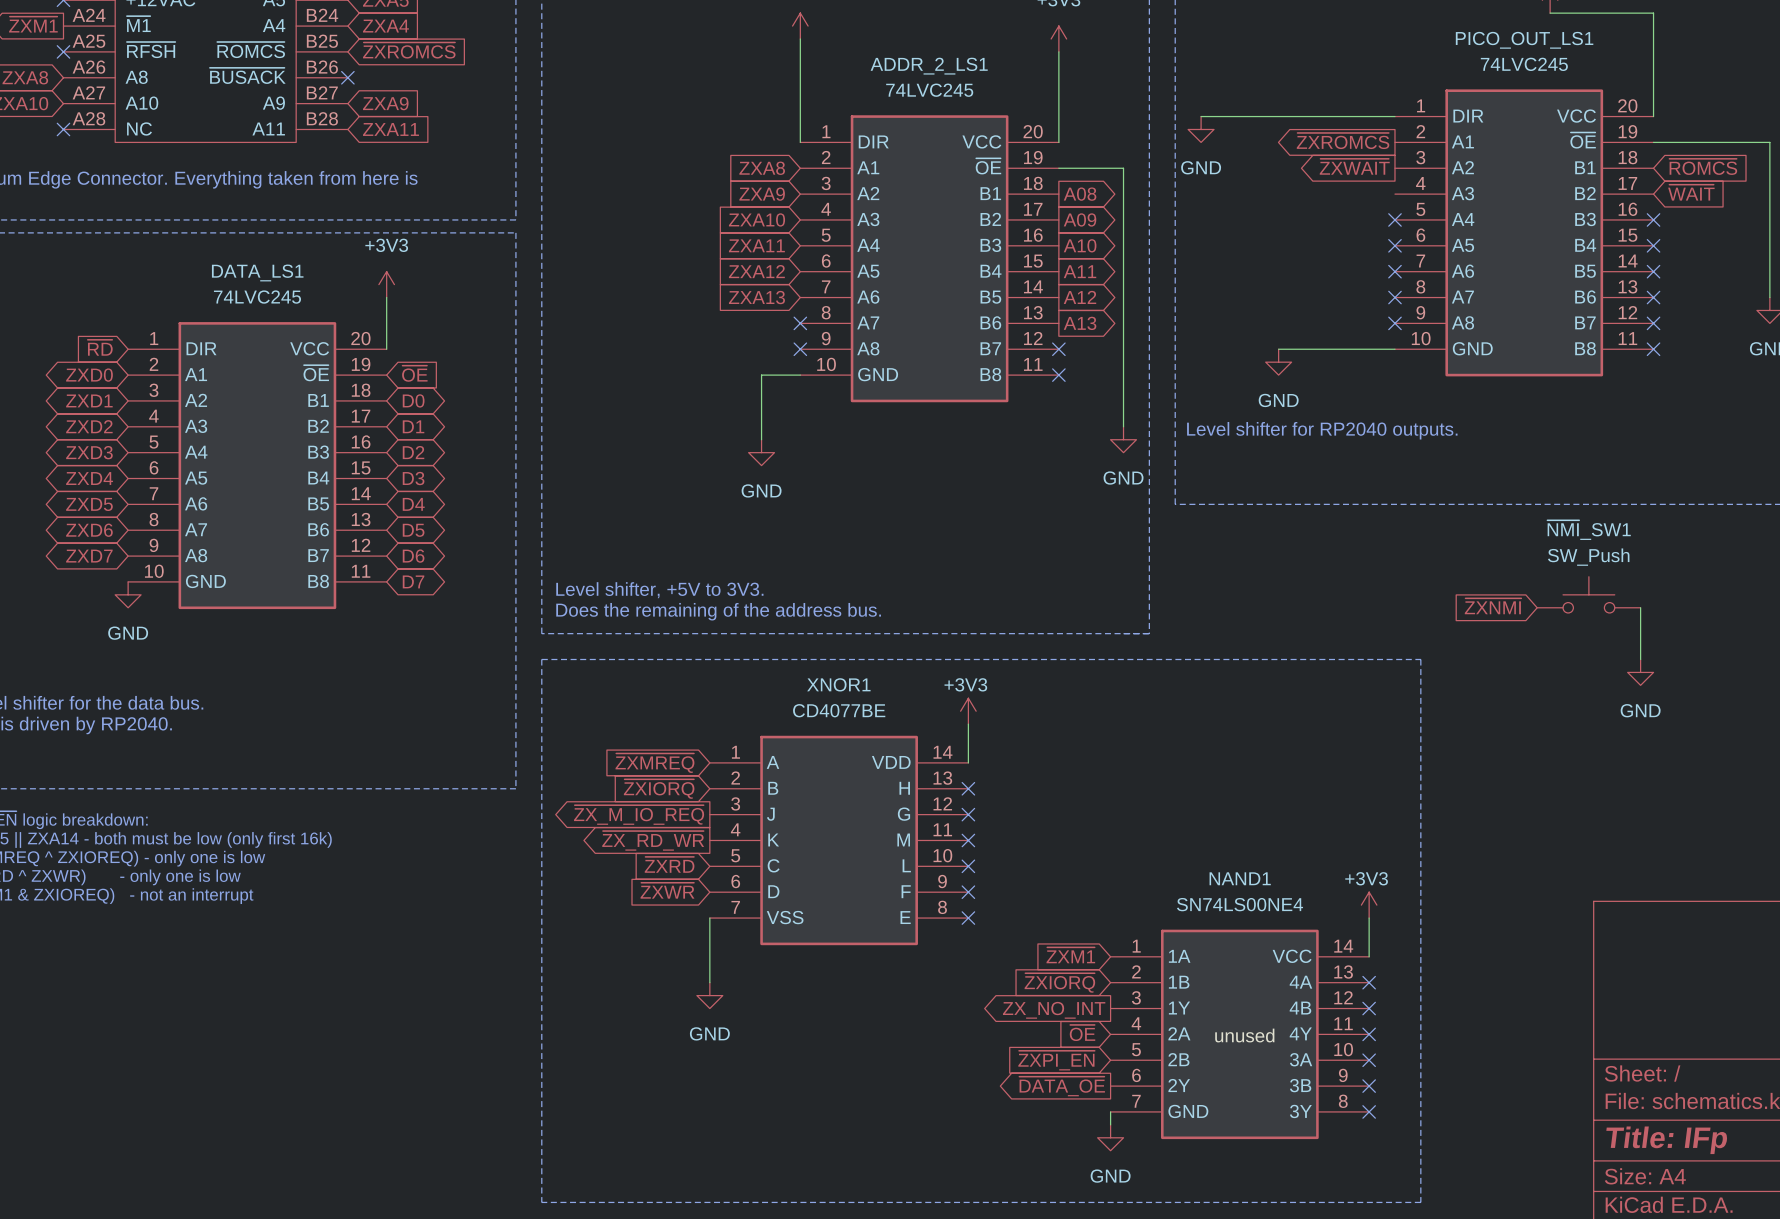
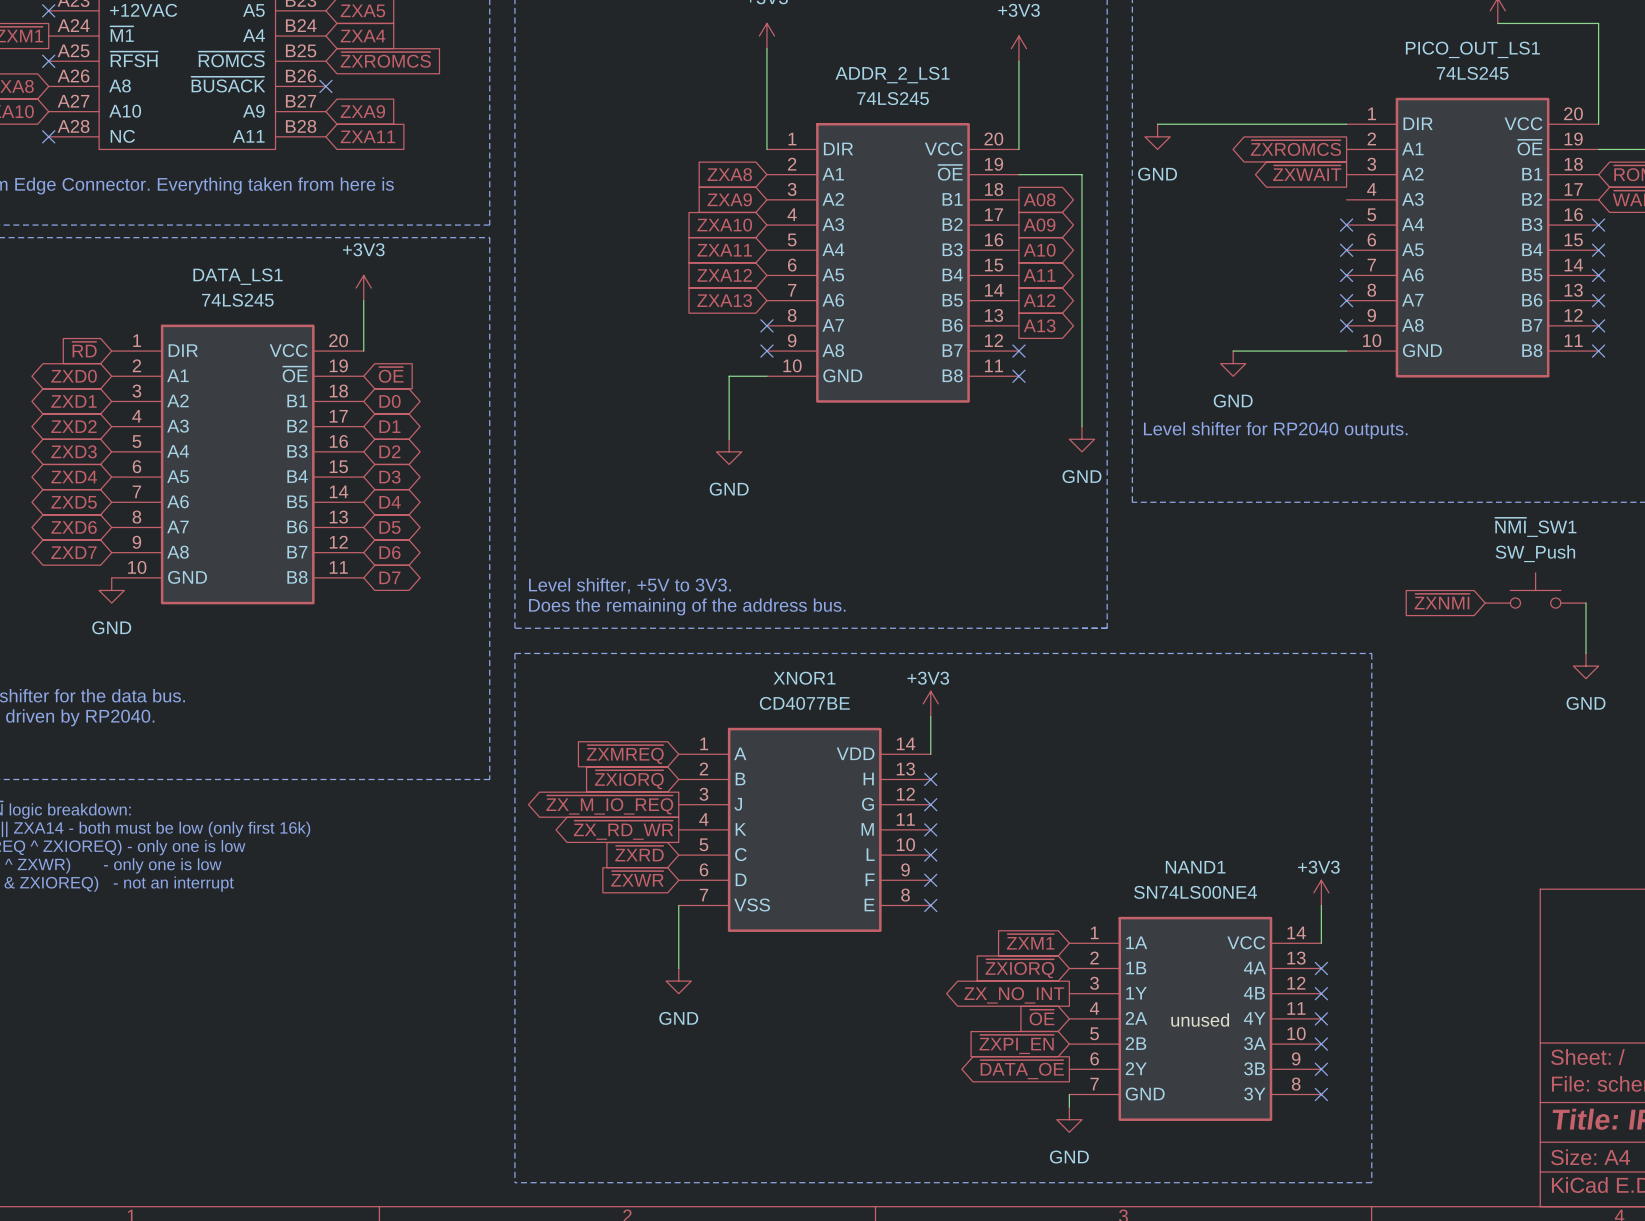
PICO_OUT_LS1 value: 74LVC245 (1524, 64) -> 74LS245 (1472, 73)
ADDR_2_LS1 value: 74LVC245 (929, 90) -> 74LS245 (893, 98)
DATA_LS1 value: 74LVC245 (257, 297) -> 74LS245 (237, 300)

